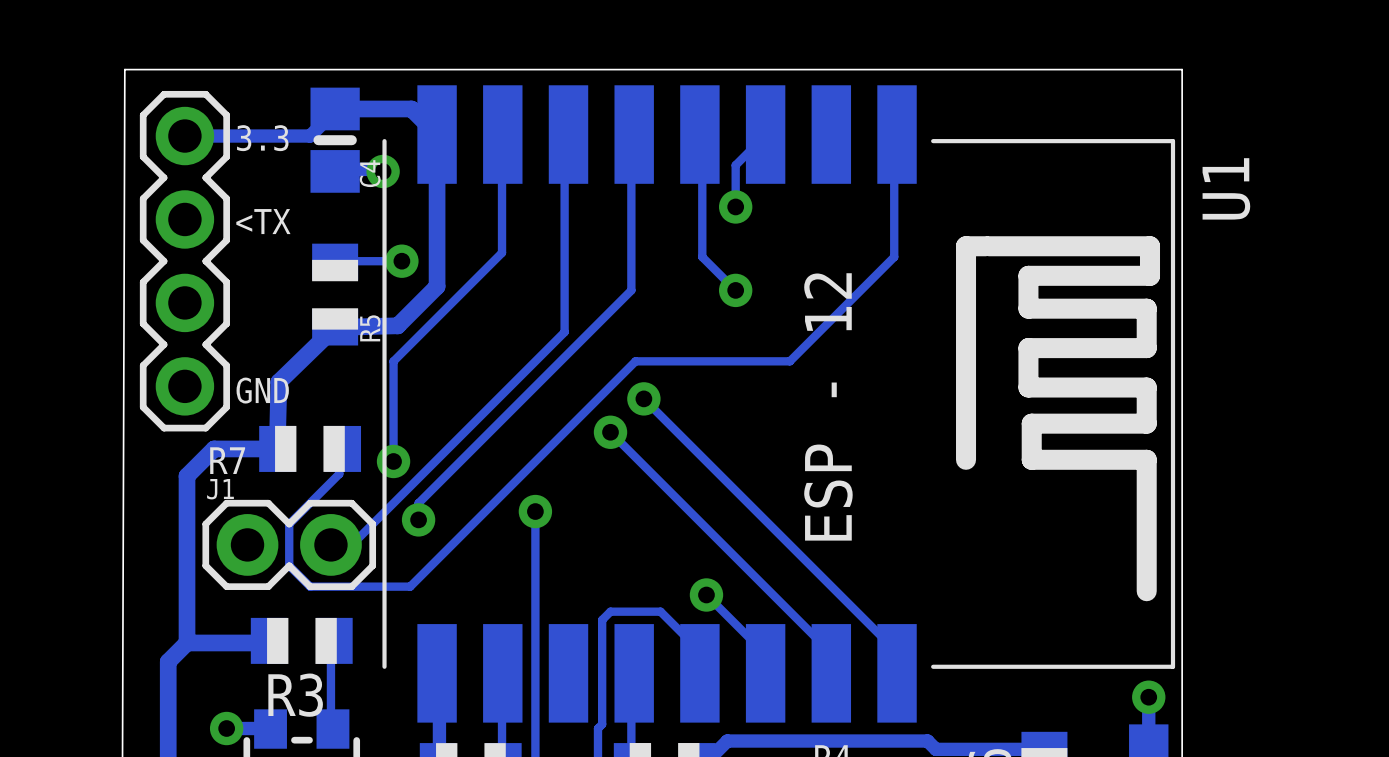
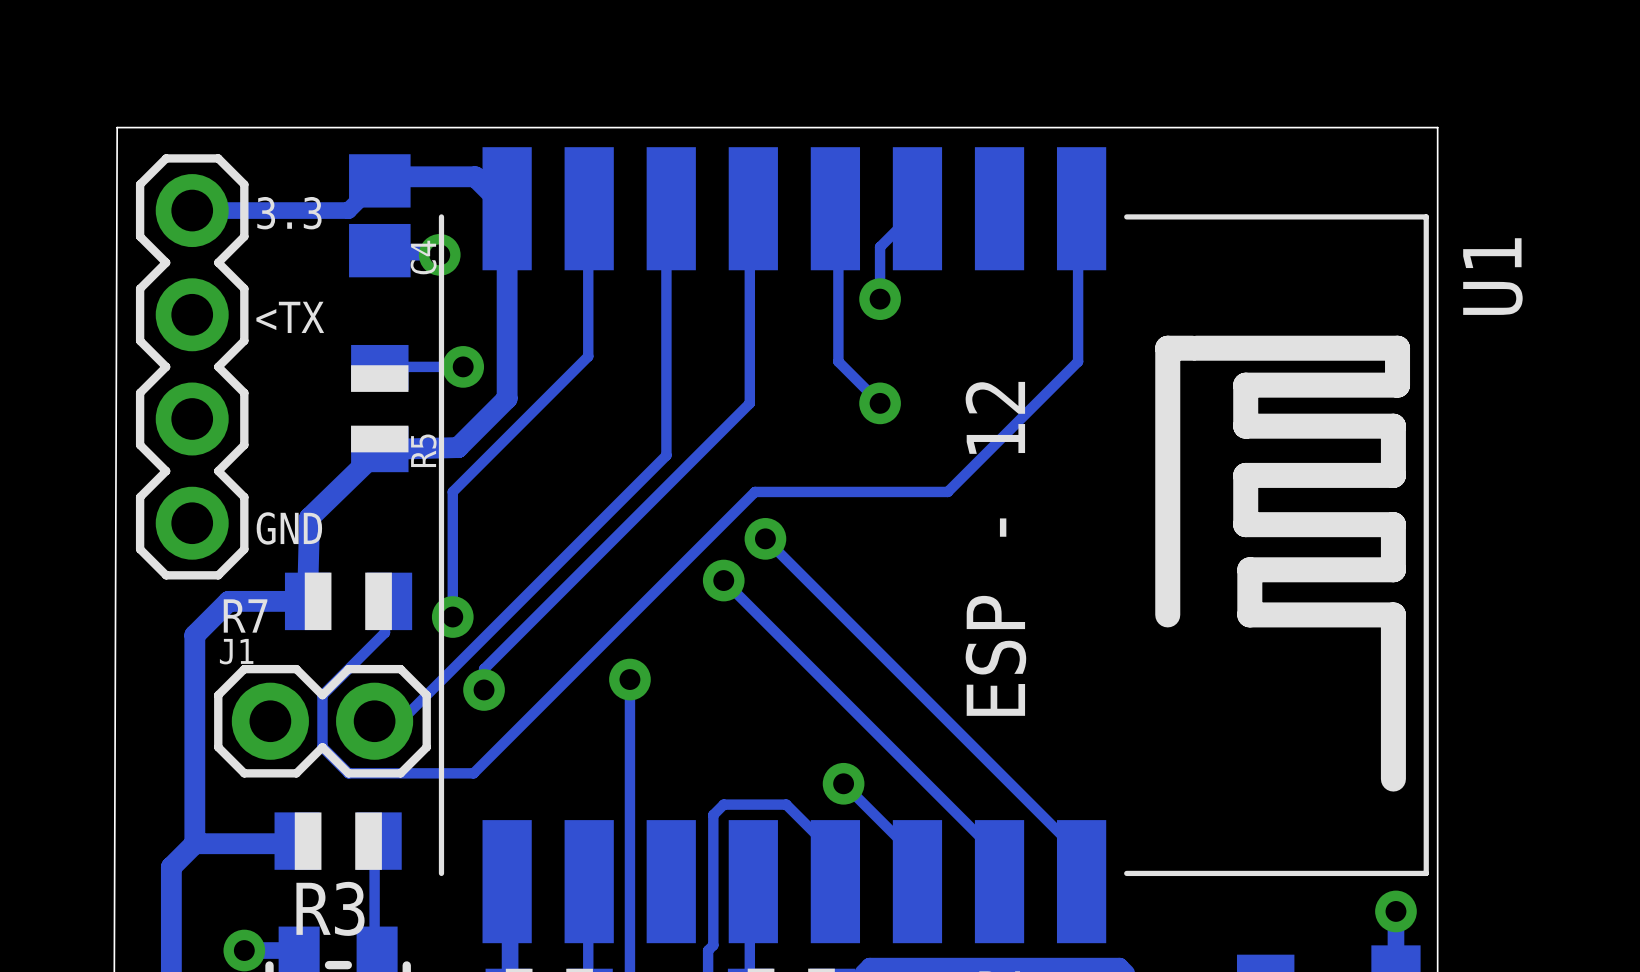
C4 footprint: [310, 87, 360, 193] -> [349, 154, 411, 278]

